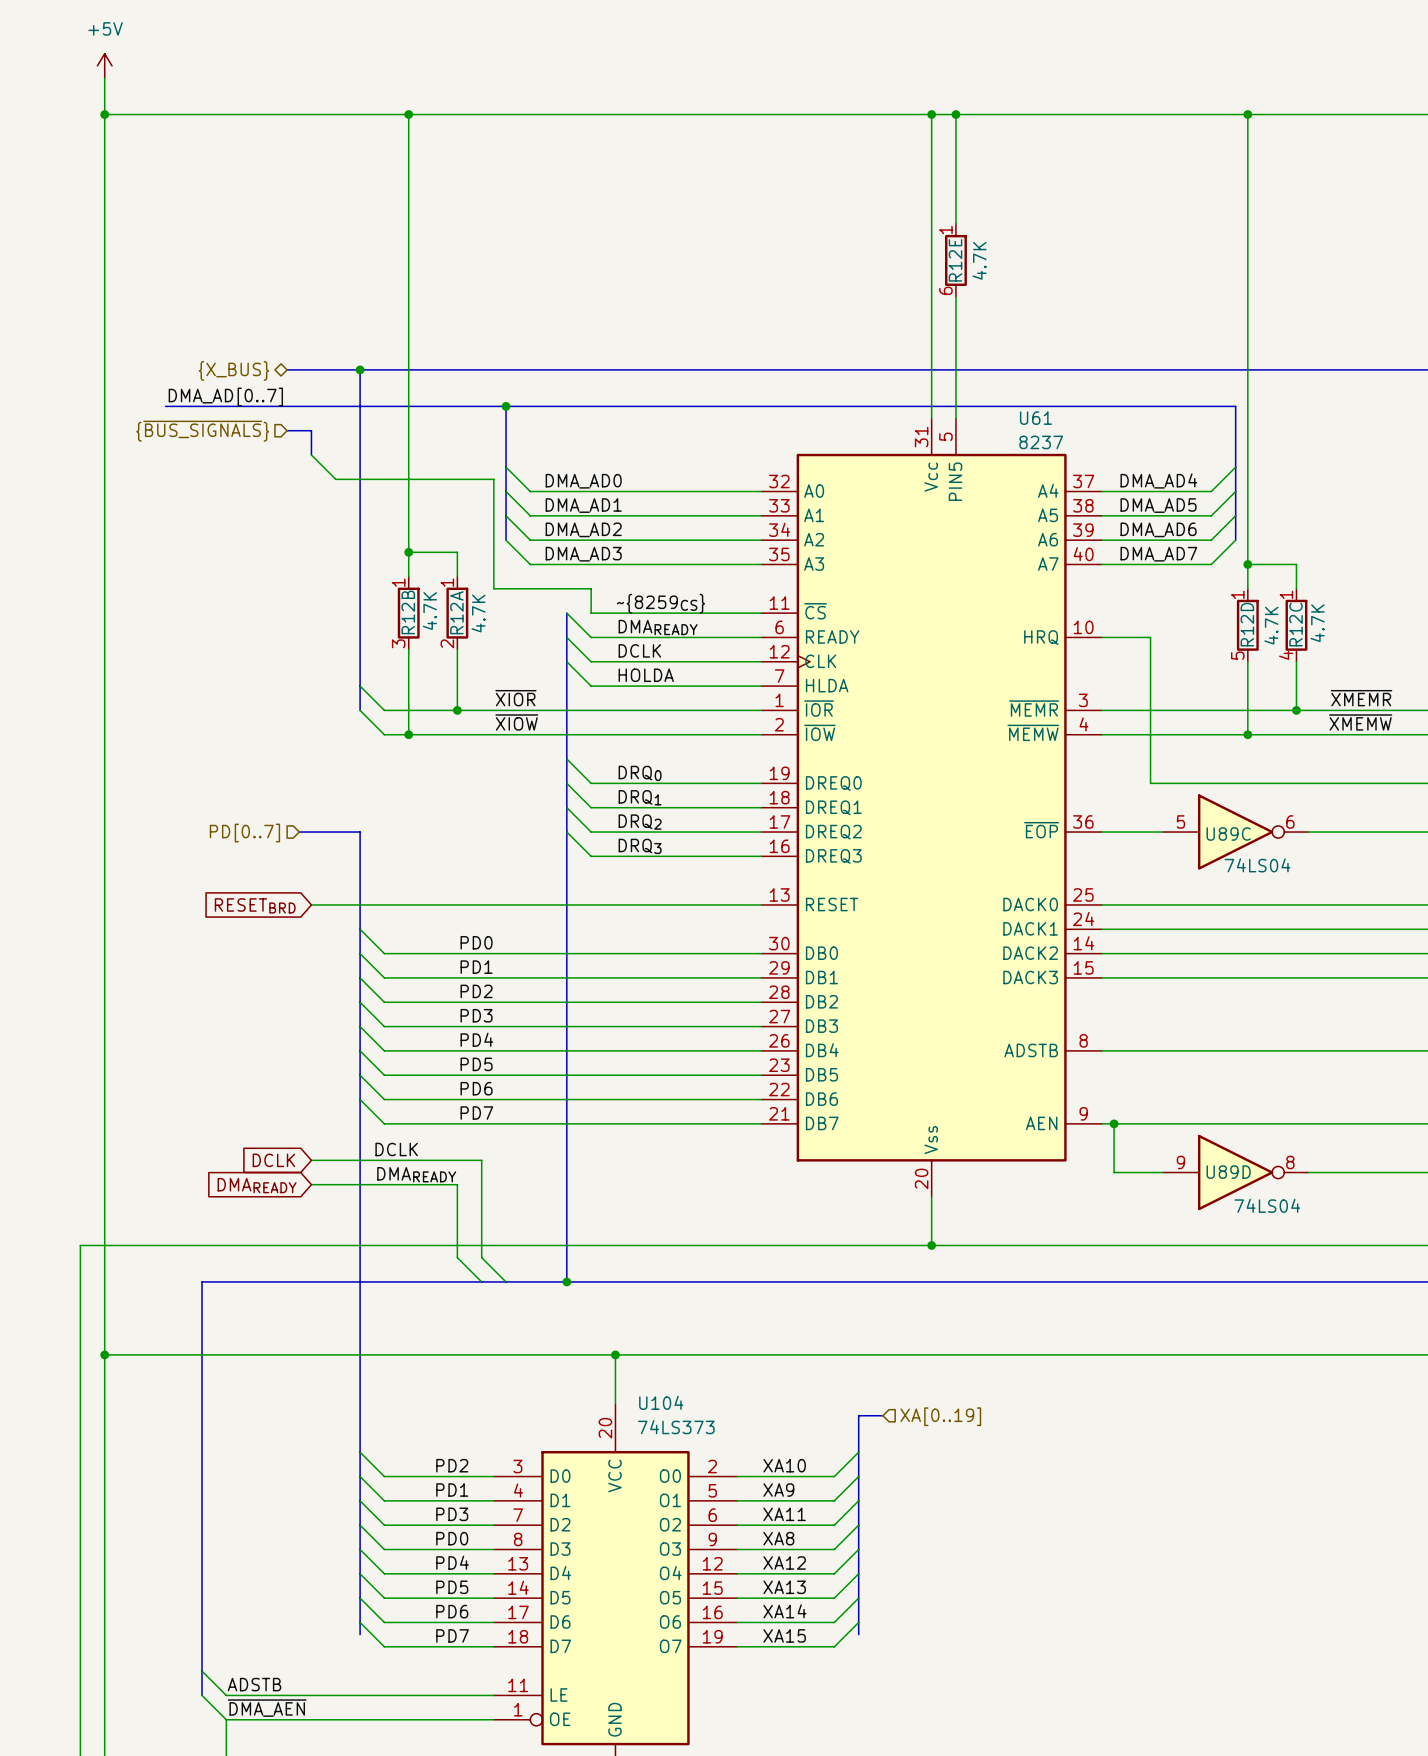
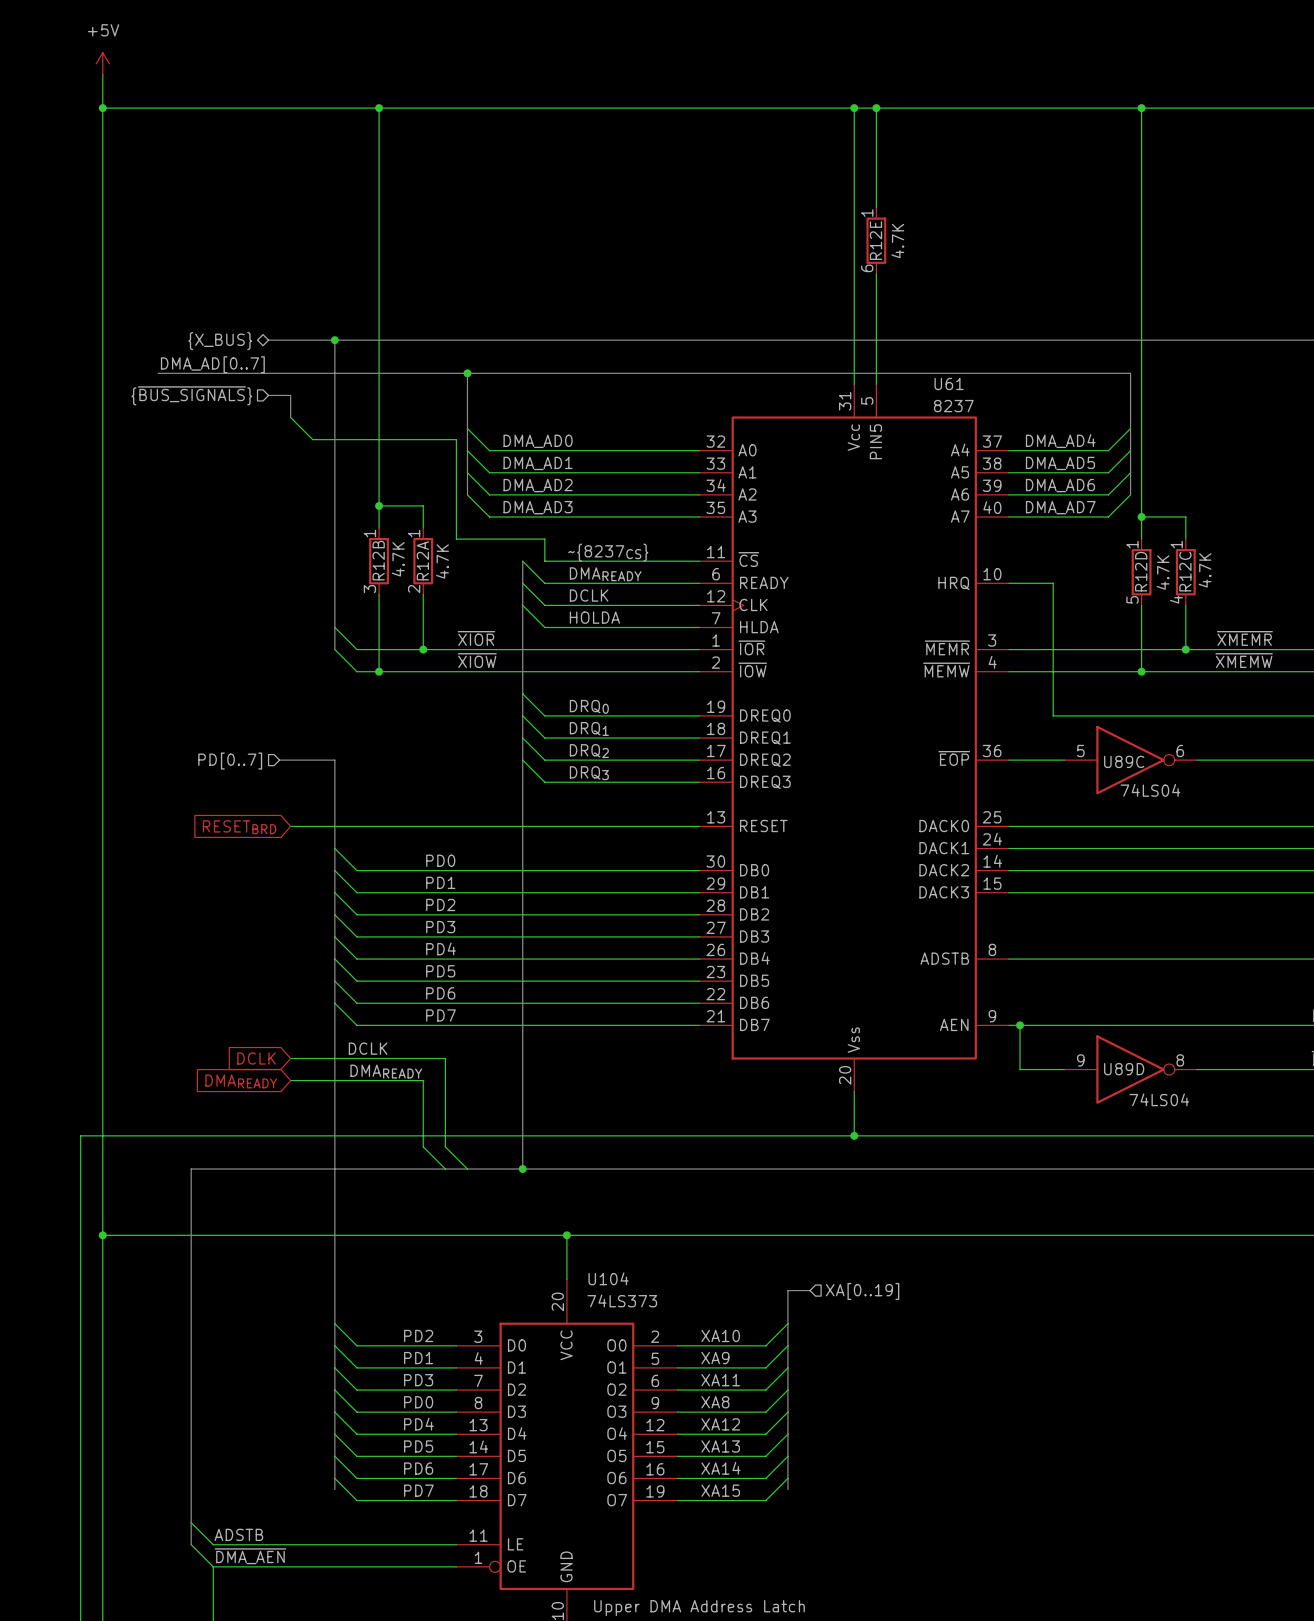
label: ~{8259CS} (660, 603) -> ~{8237CS} (608, 552)

